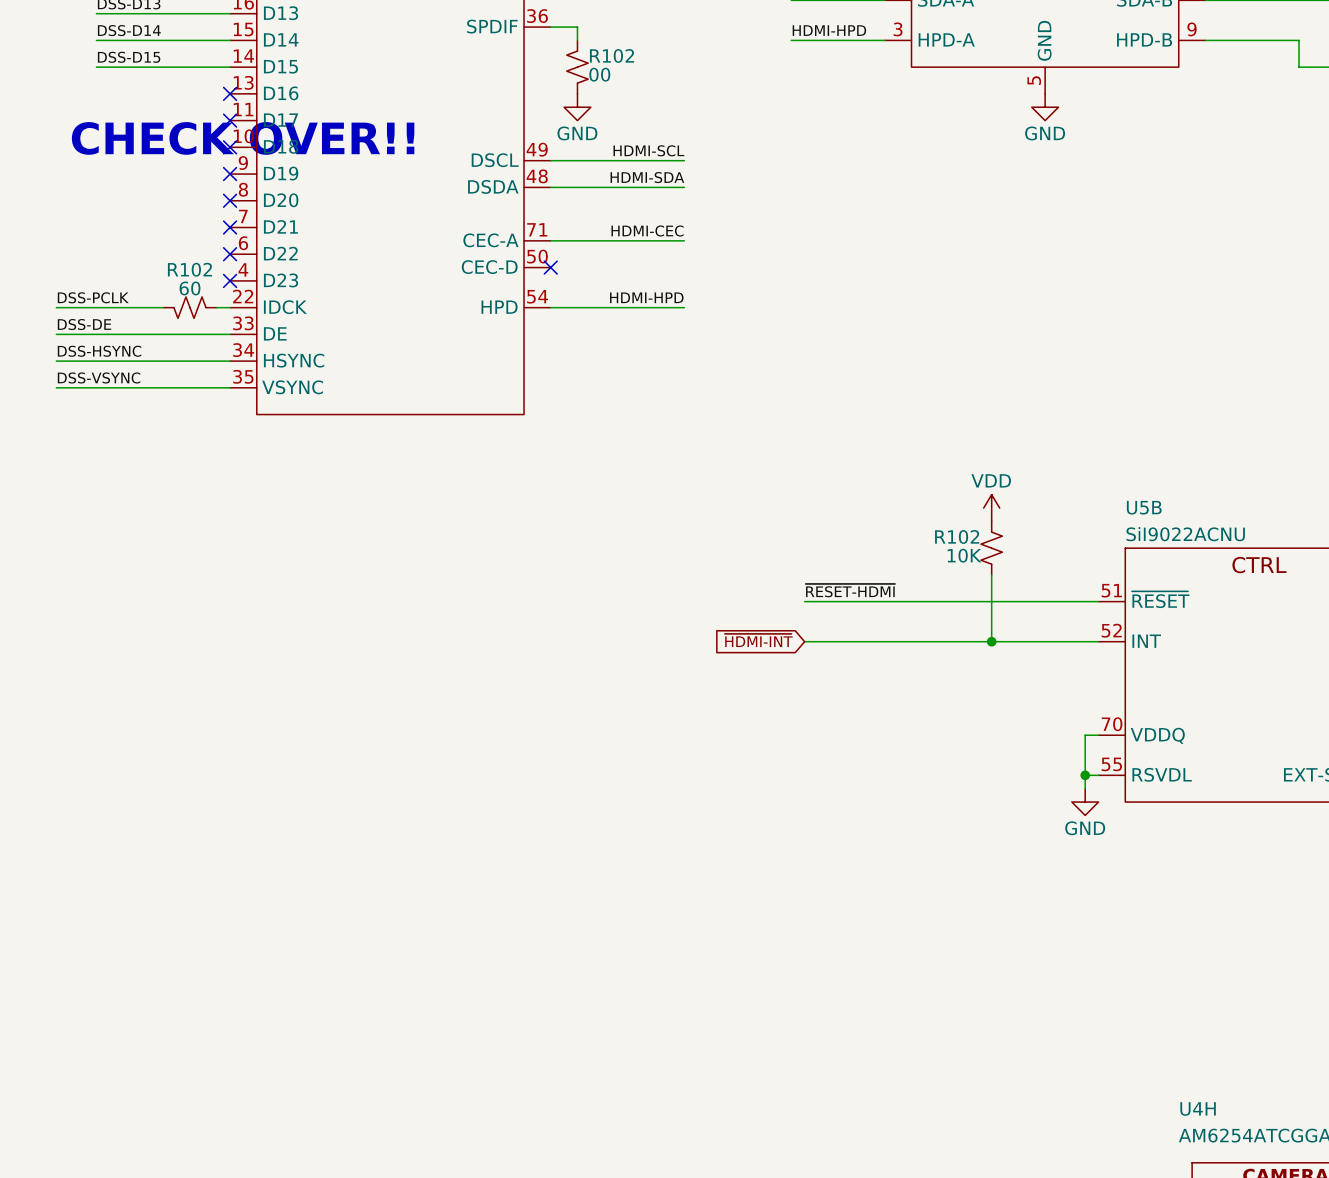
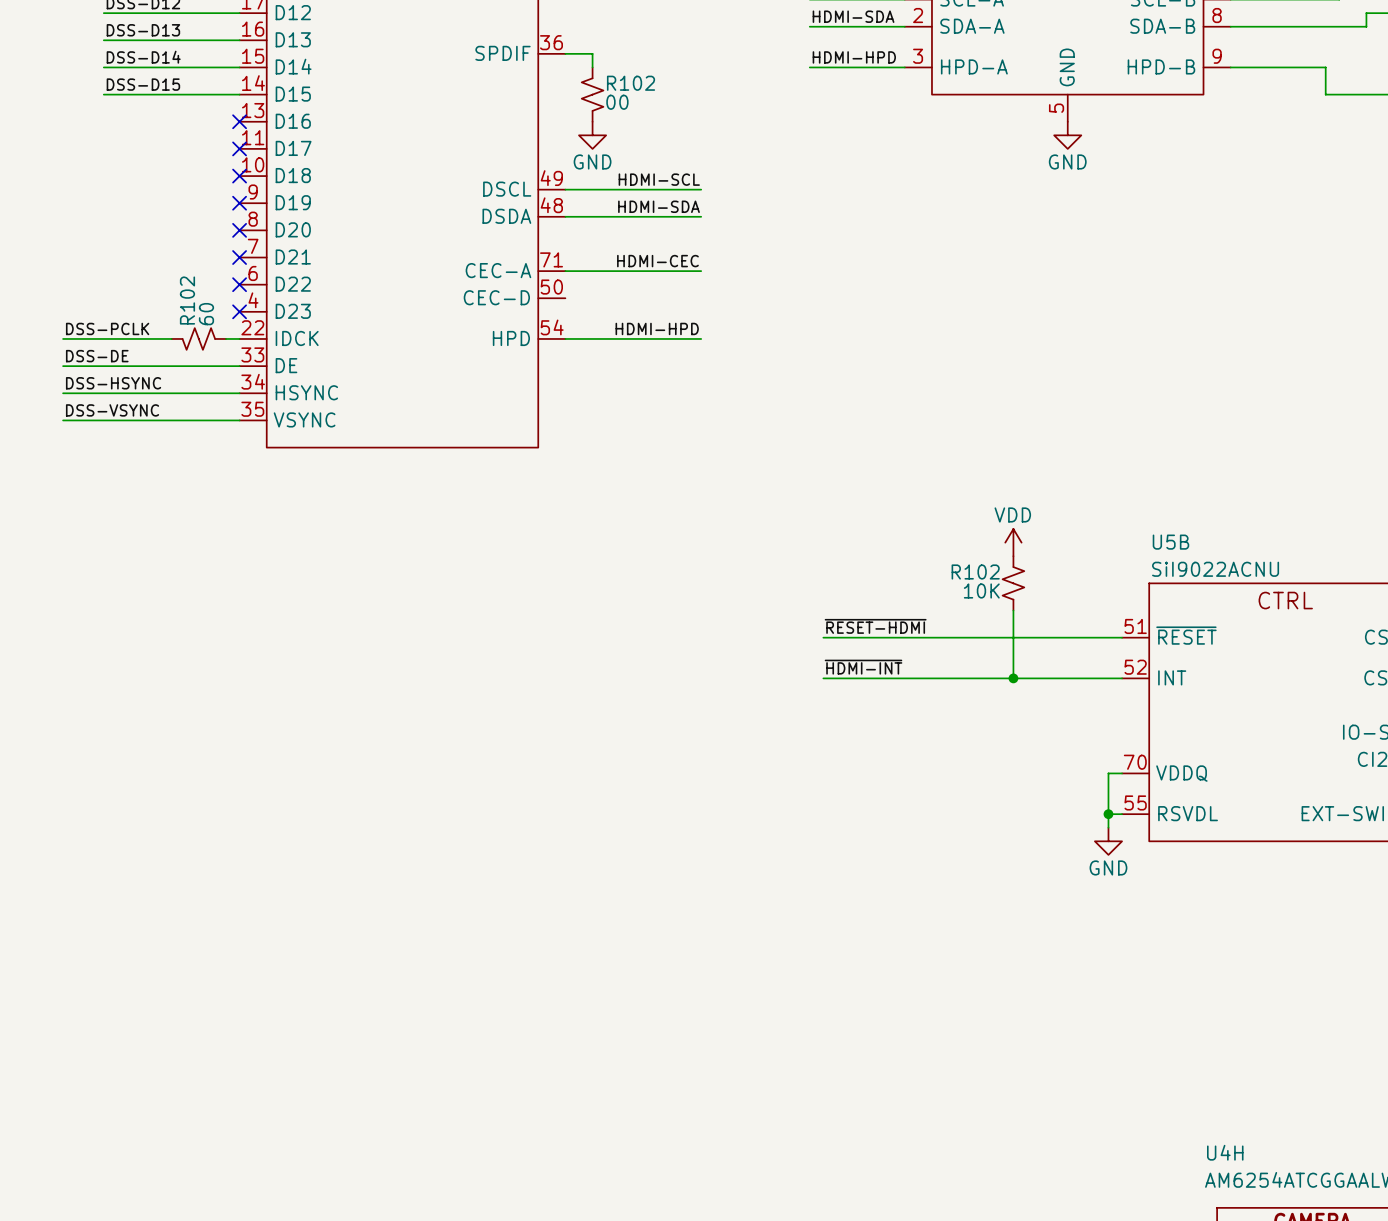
text: CHECK OVER!! (243, 138) -> none
no-connect mark: (550, 267) -> none
R102 name rotation: 0° (189, 269) -> 90° counterclockwise (187, 300)
R102 value rotation: 0° (190, 288) -> 90° counterclockwise (206, 314)
label: none -> ~{HDMI-INT} (863, 667)
global label: ~{HDMI-INT} (758, 640) -> none

